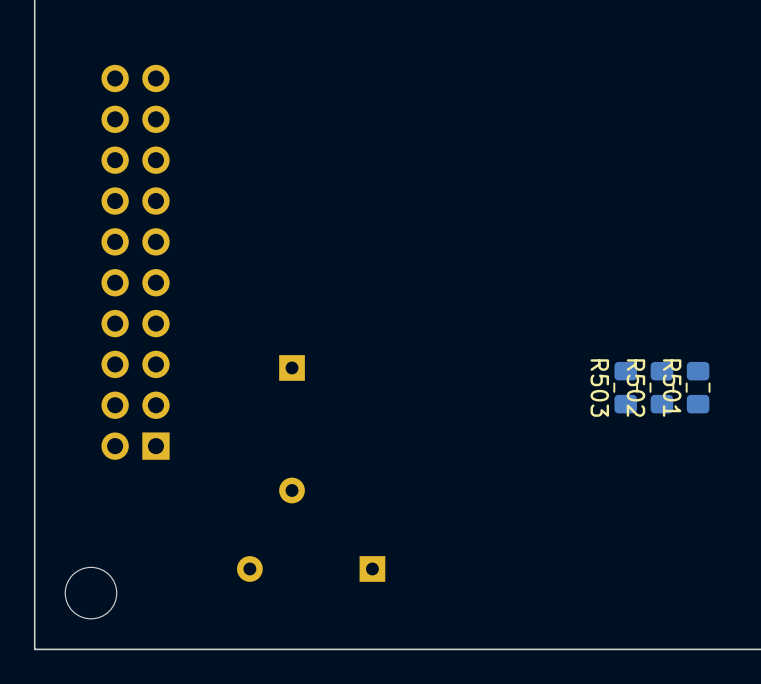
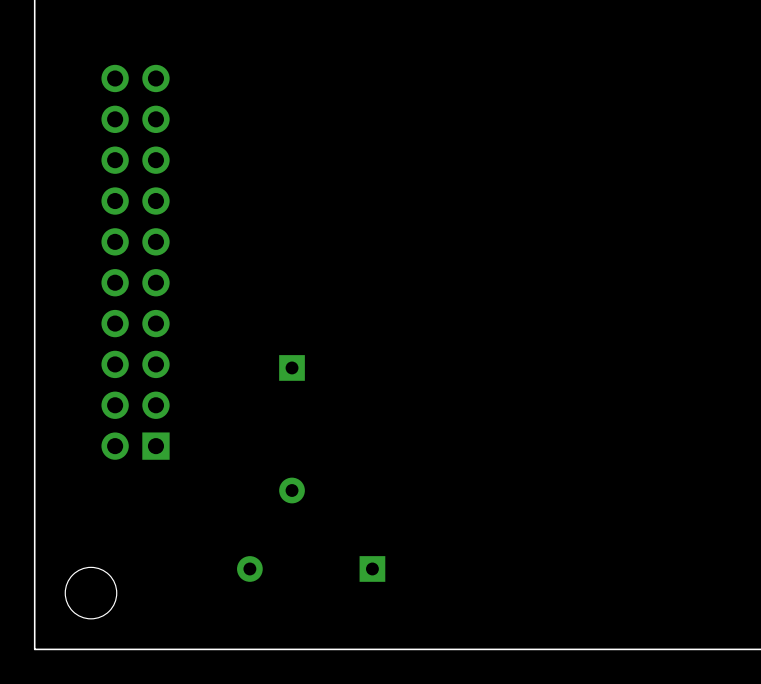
R503: (625, 387) -> none
R502: (661, 387) -> none
R501: (698, 387) -> none

